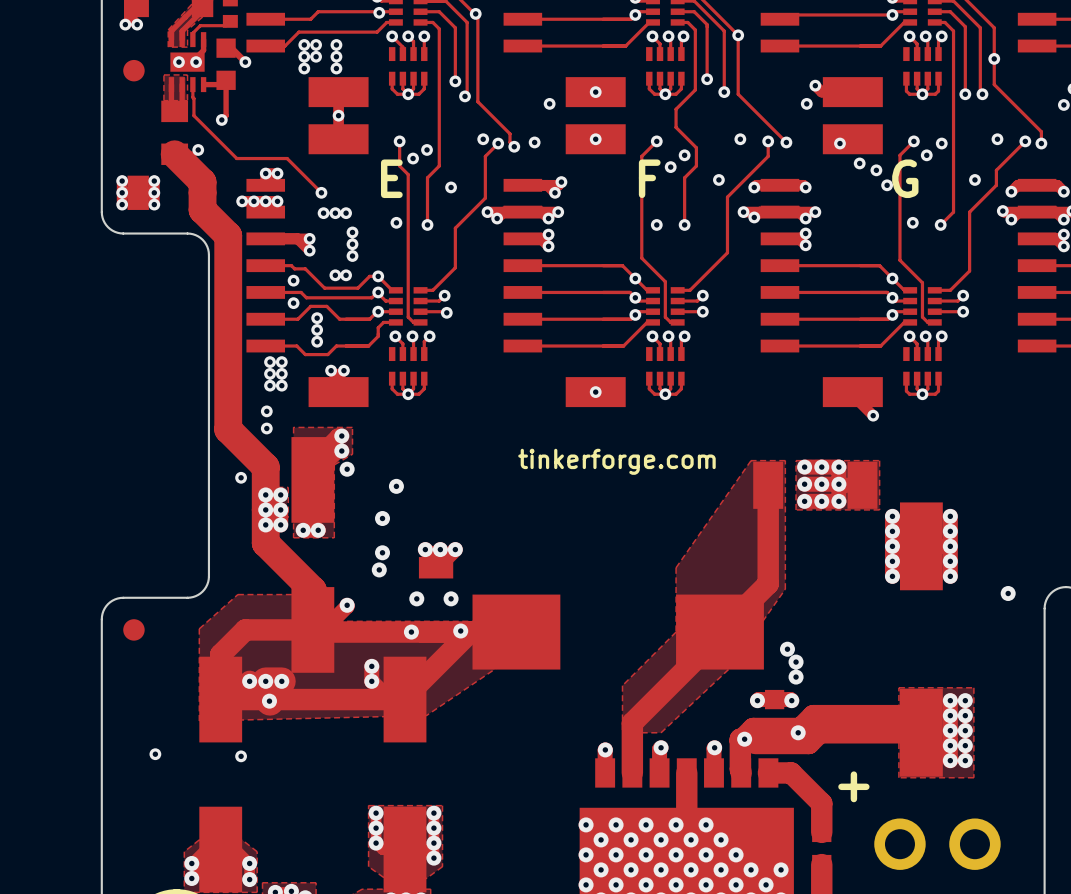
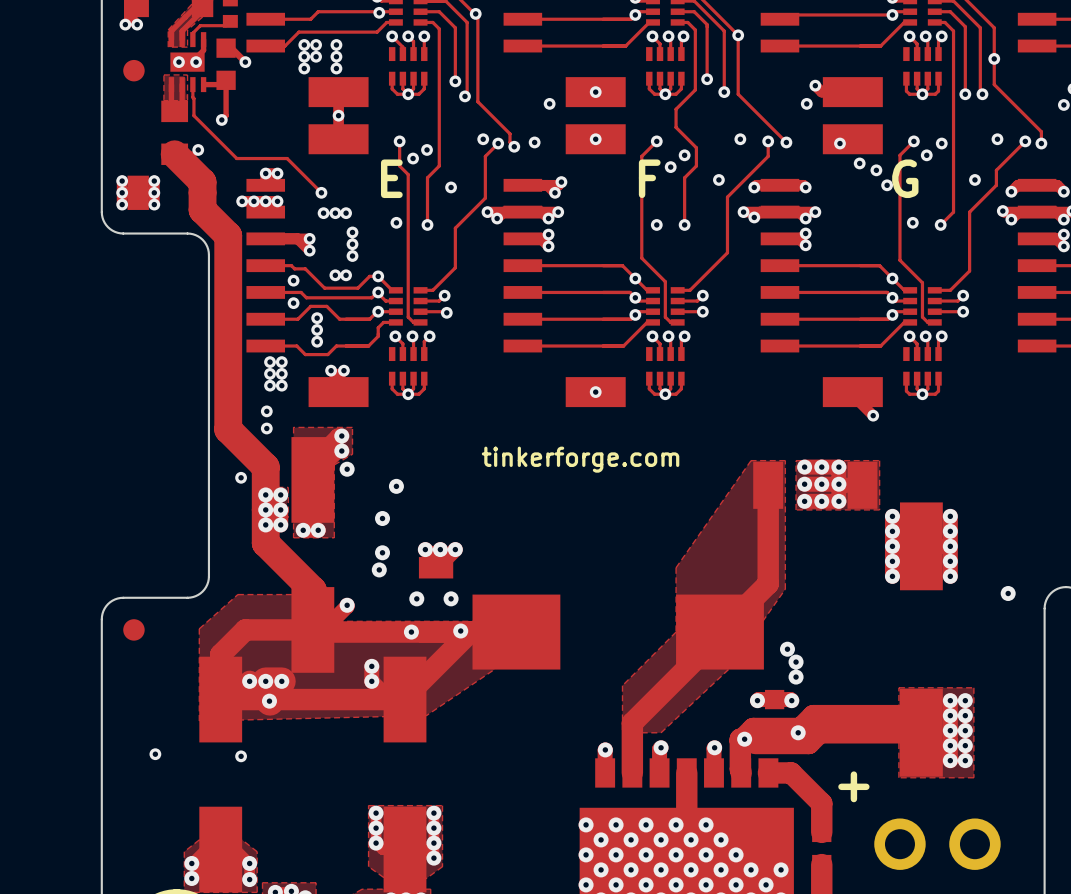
text position: tinkerforge.com (616, 461) -> tinkerforge.com (580, 459)

